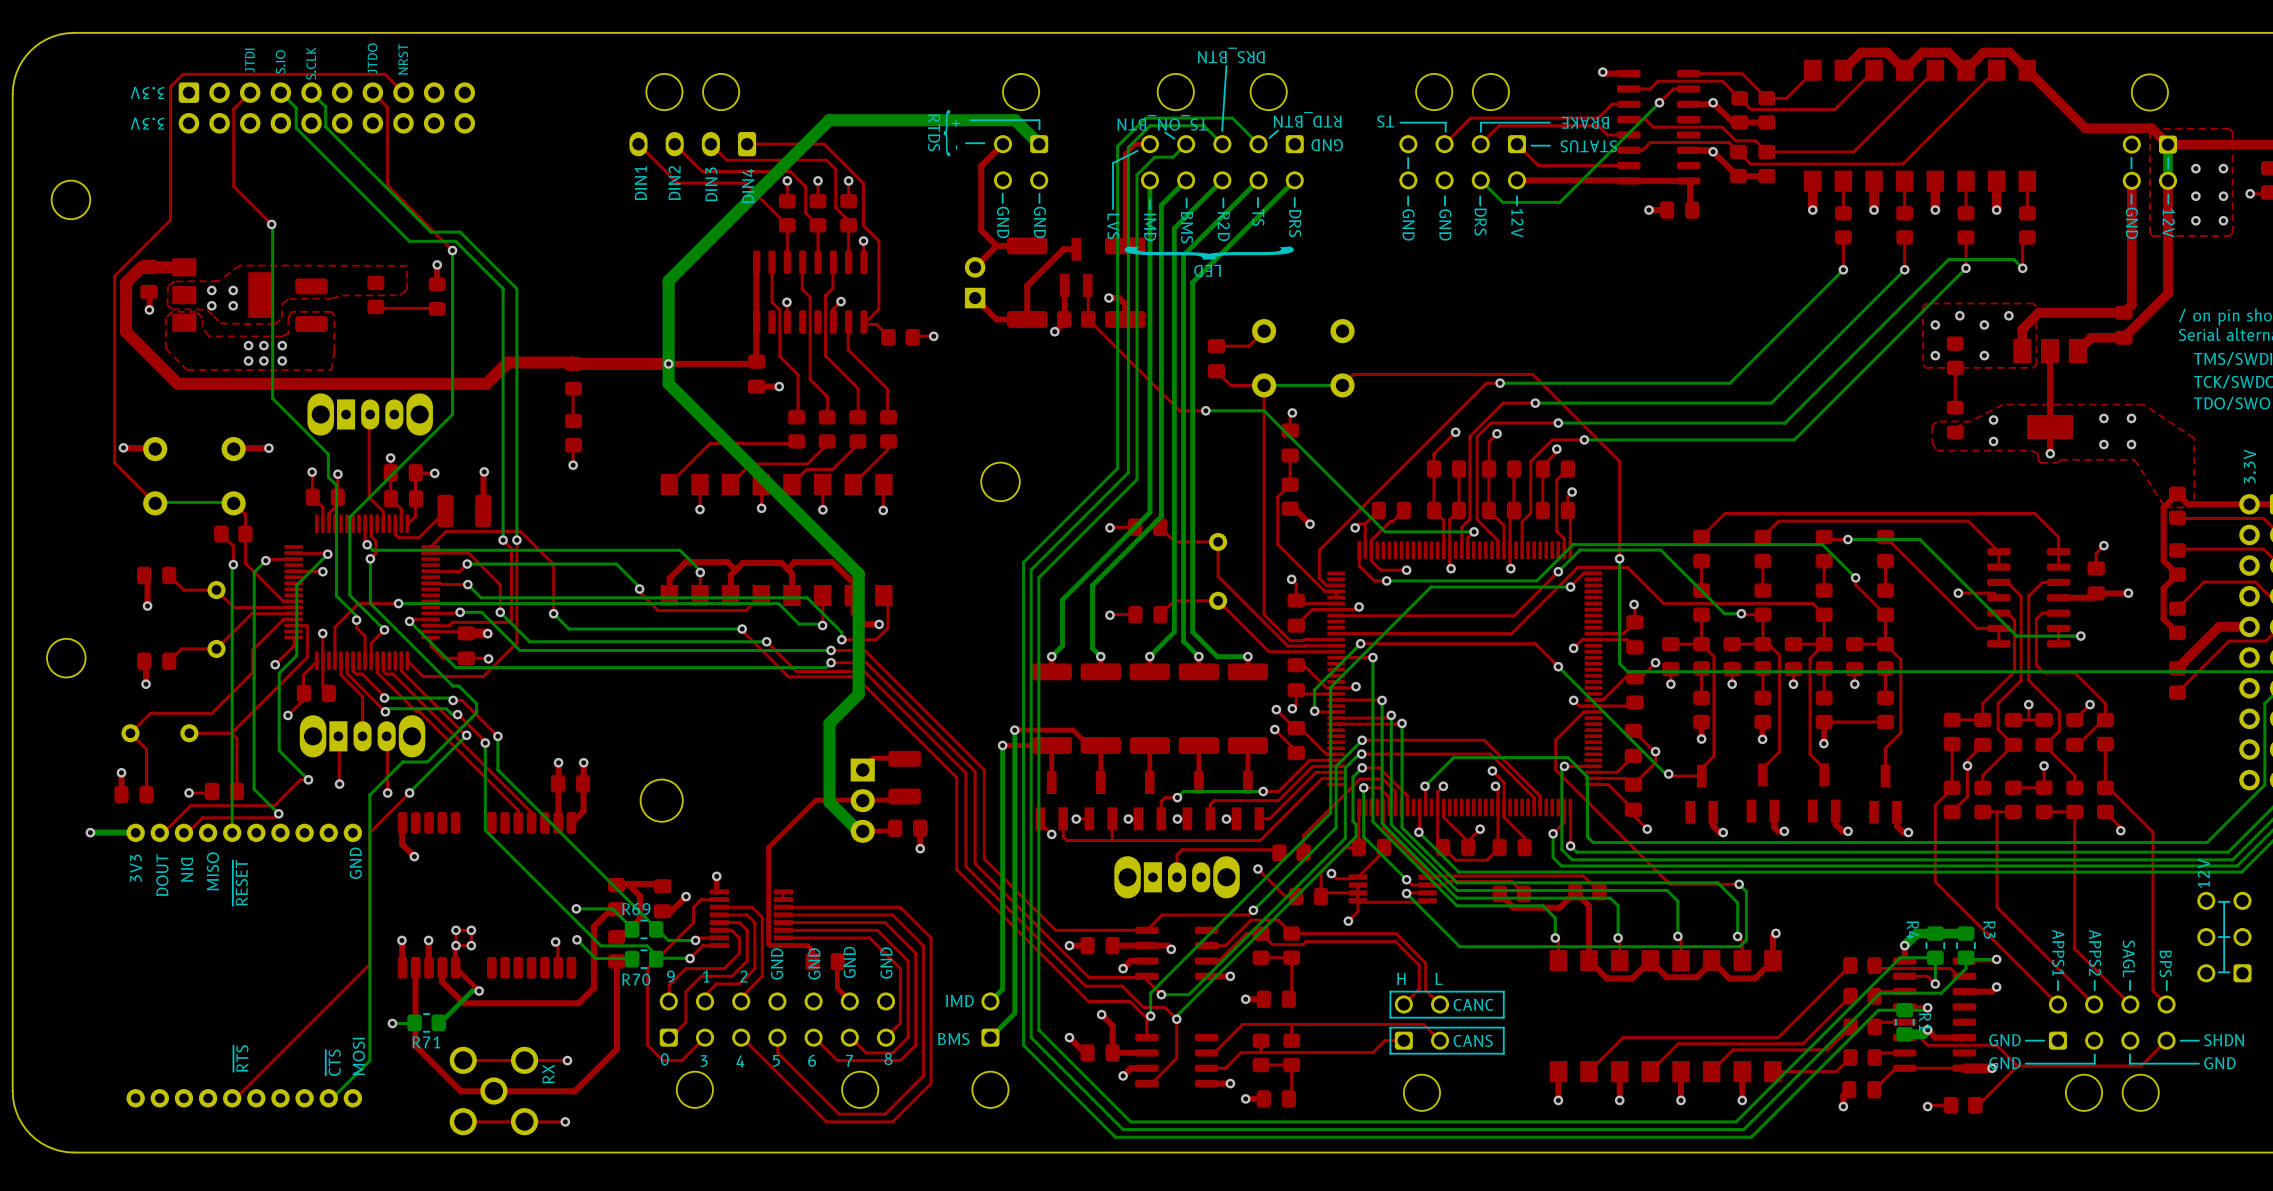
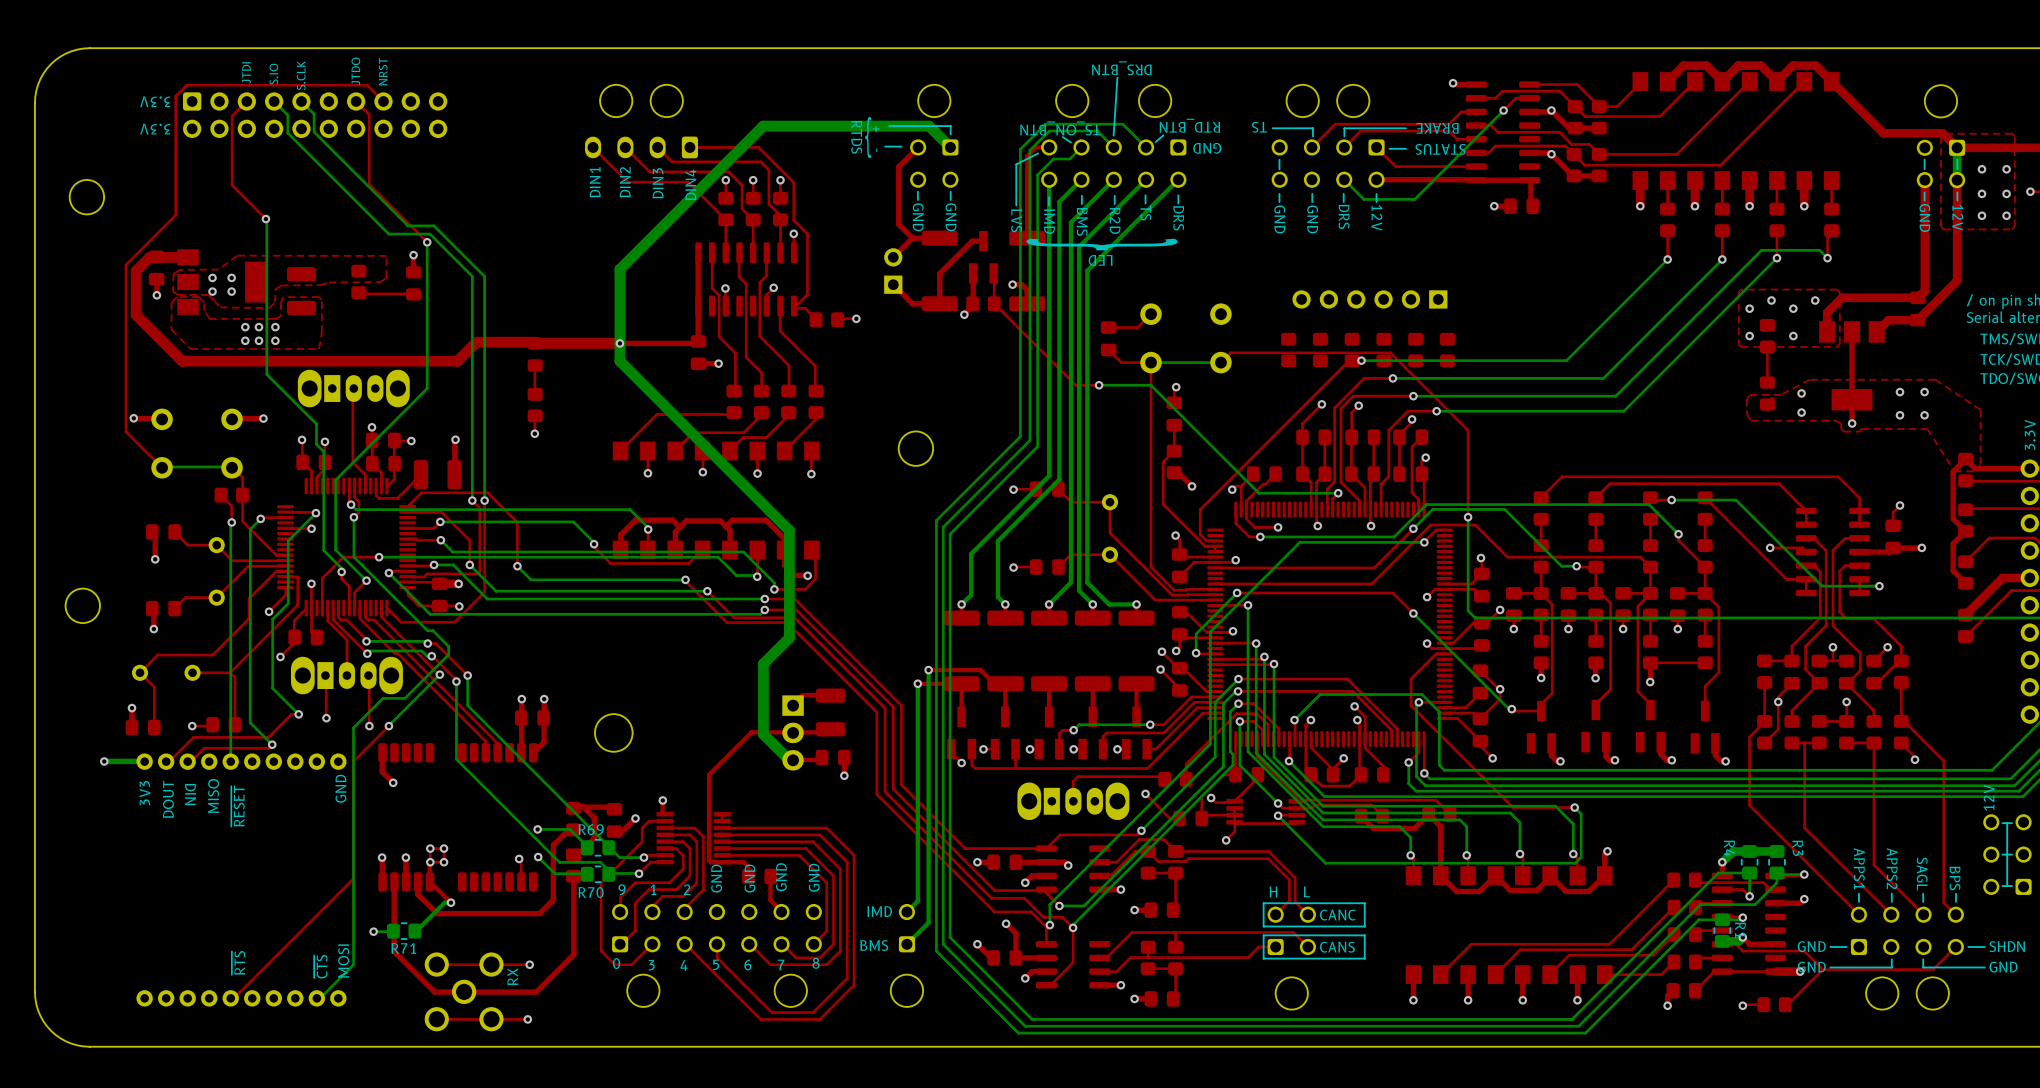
part: none -> (1369, 299)
part: none -> (1288, 350)
part: none -> (1320, 350)
part: none -> (1352, 350)
part: none -> (1383, 350)
part: none -> (1415, 350)
part: none -> (1447, 350)

